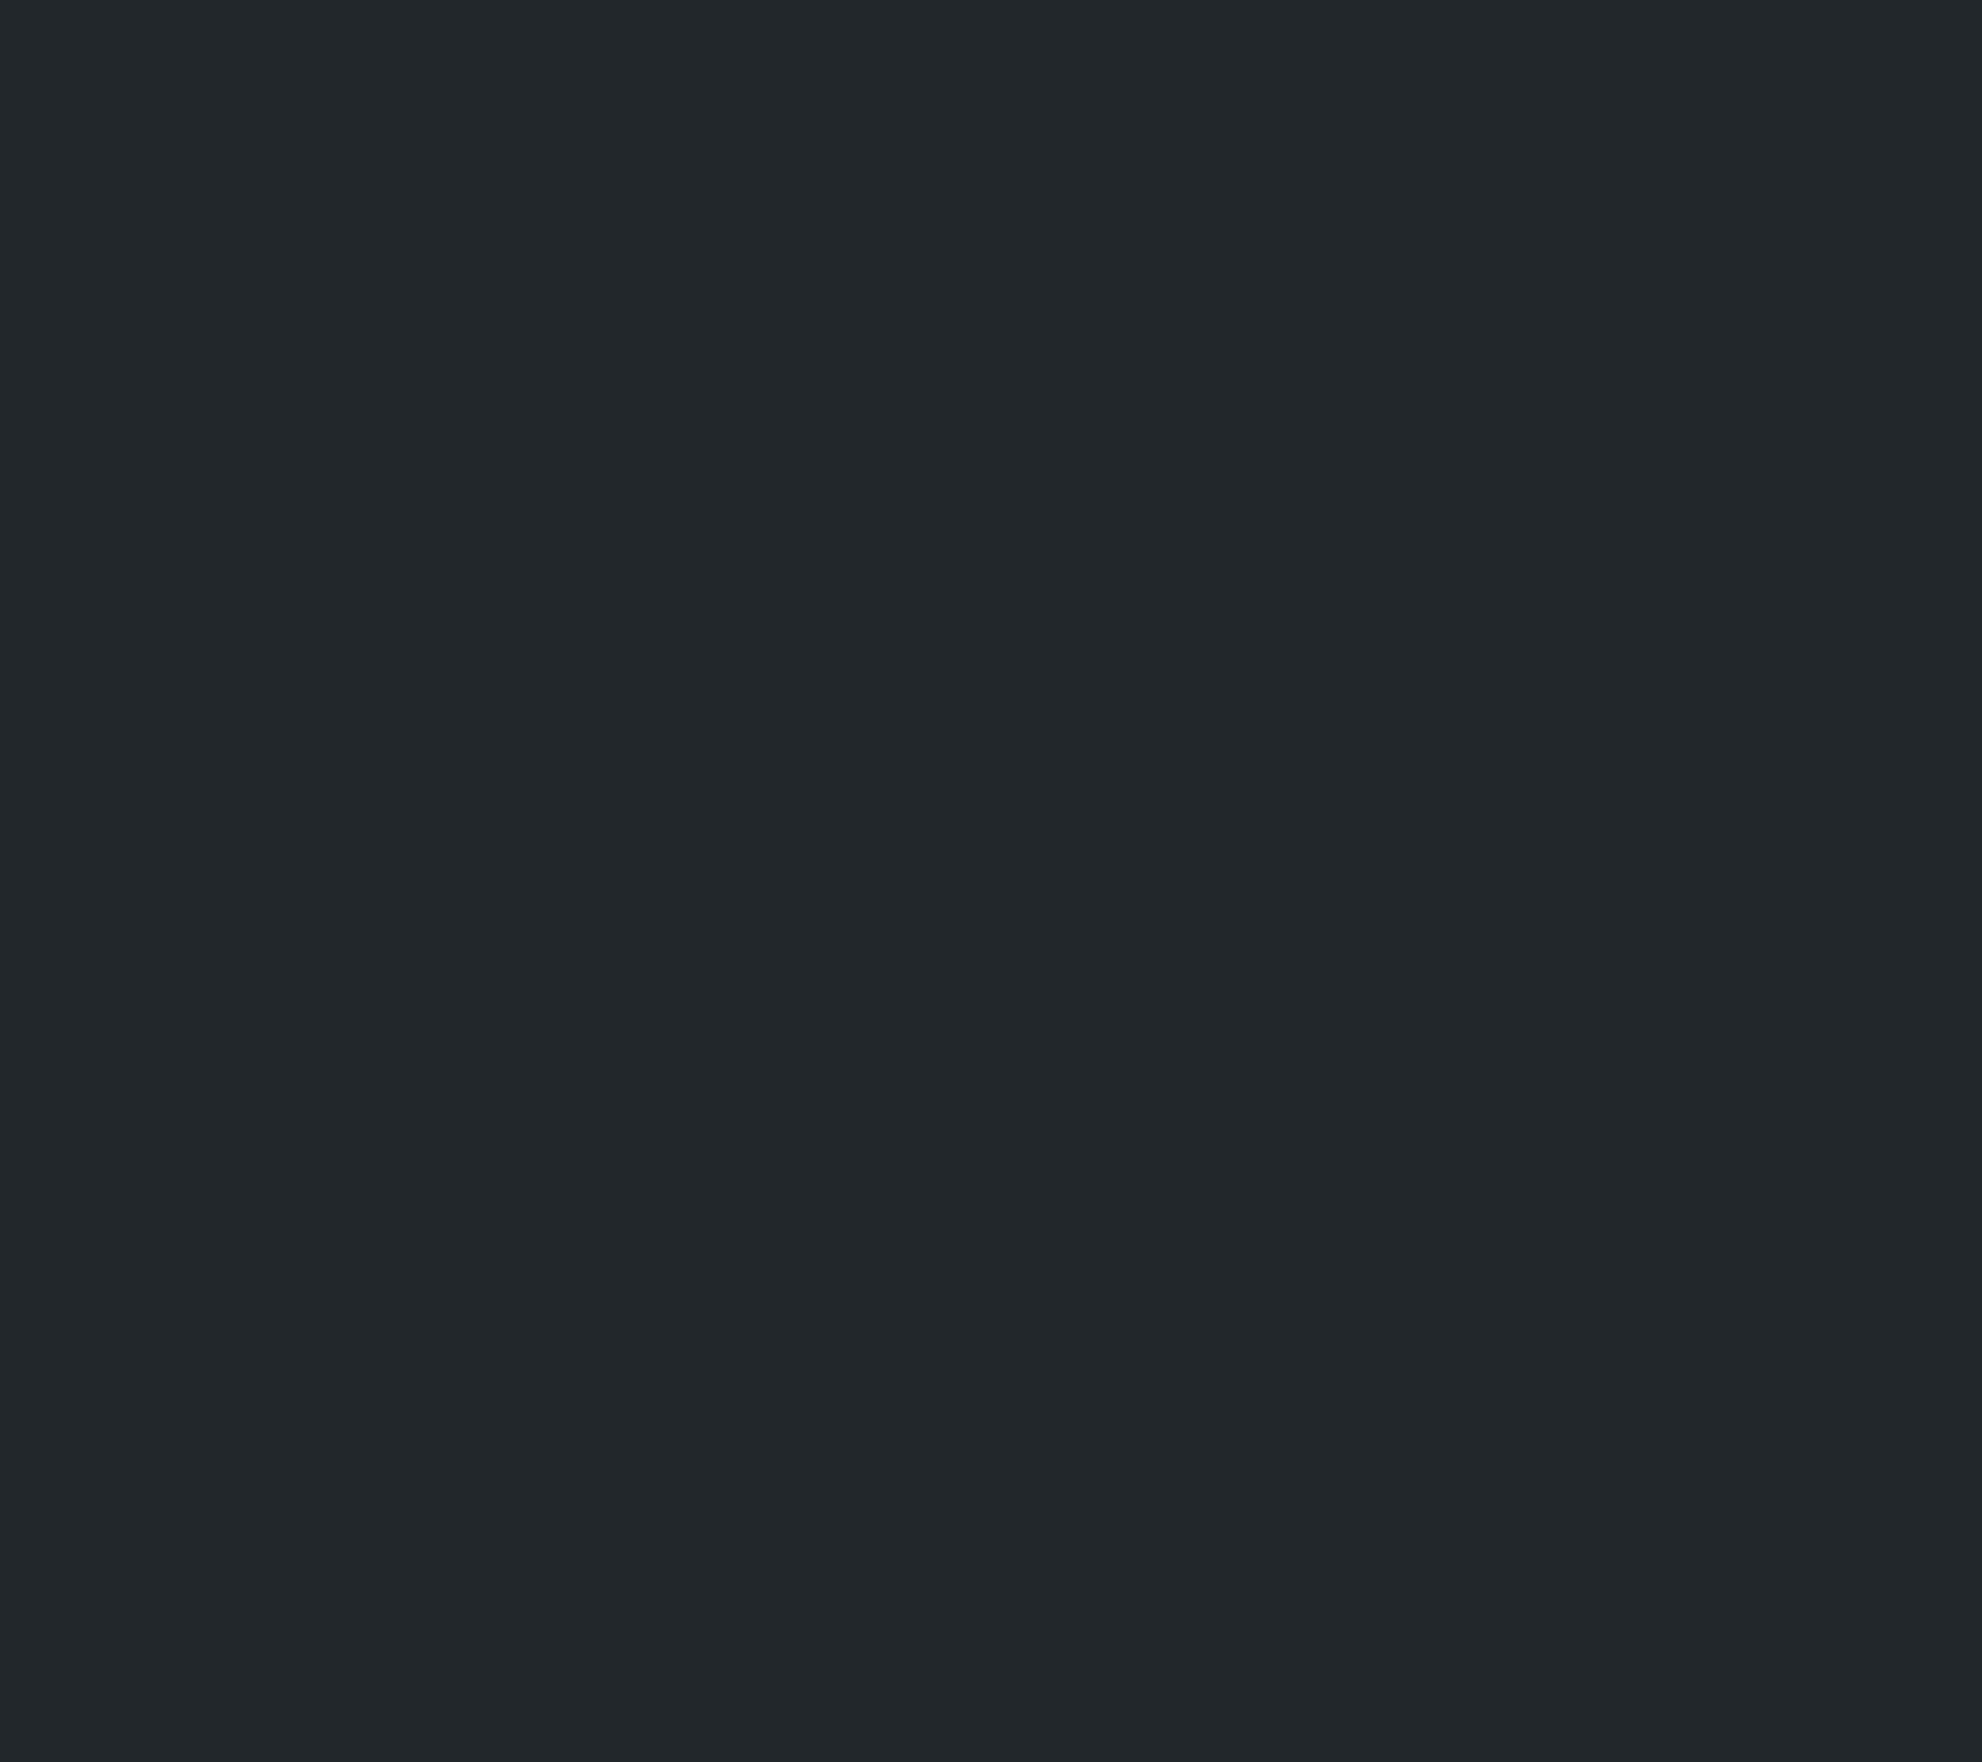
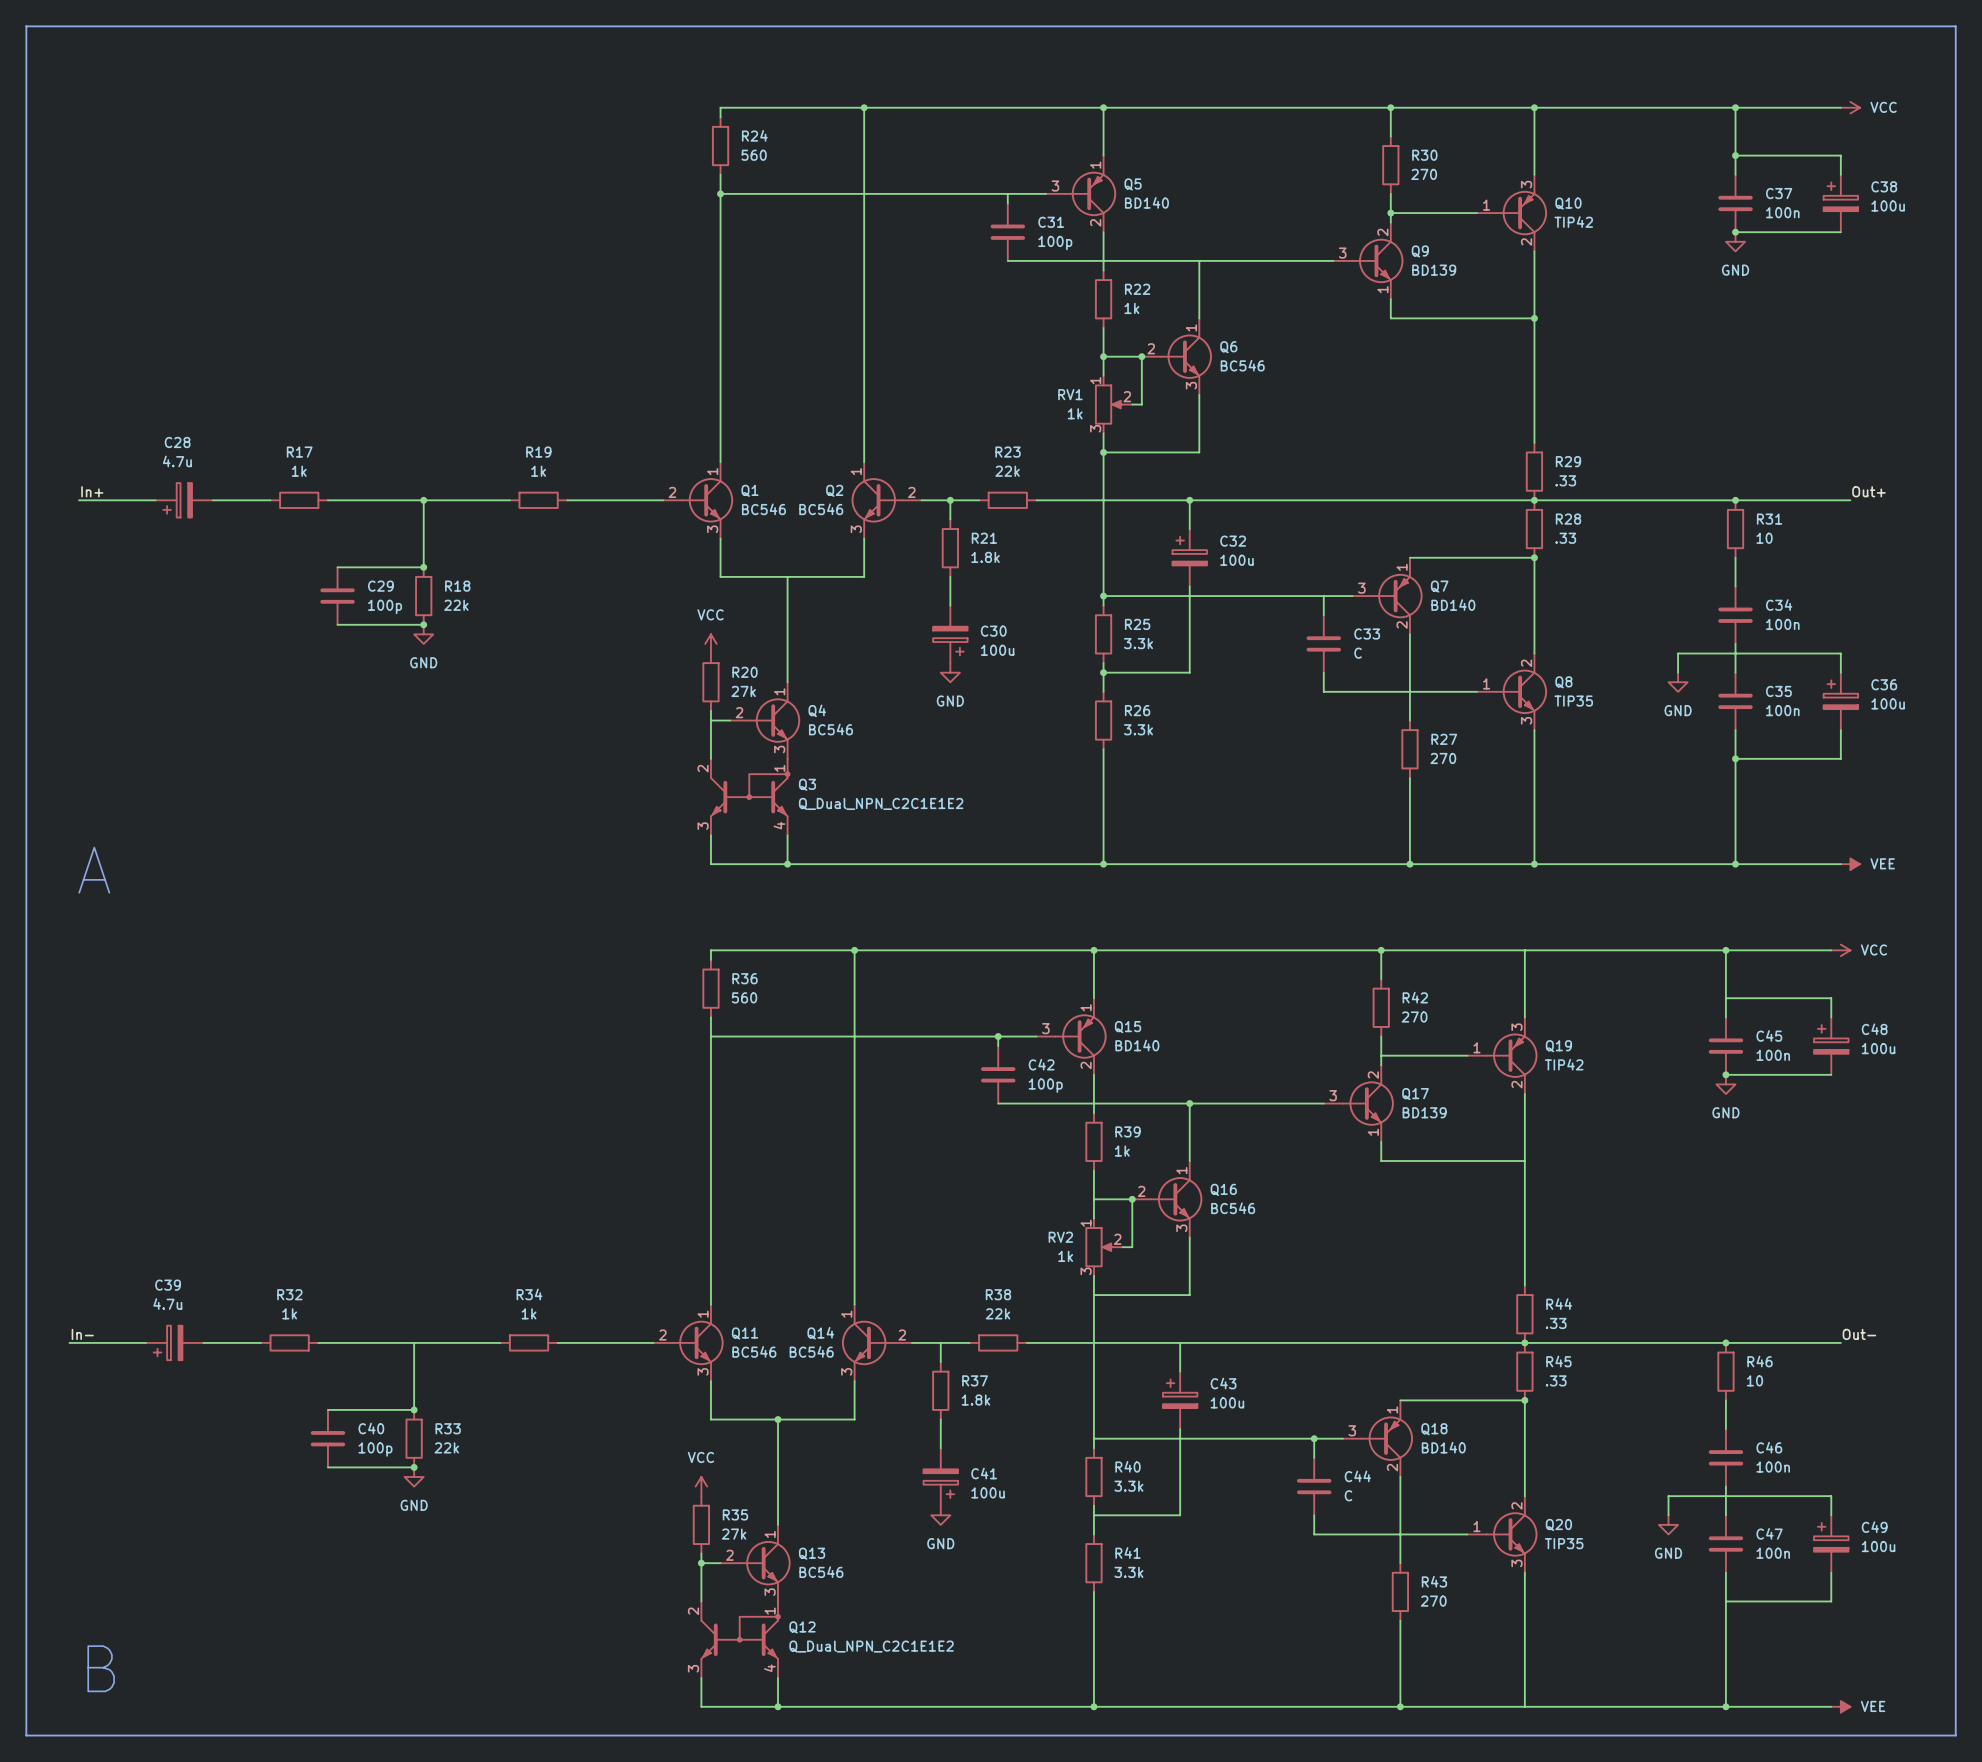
line: none -> (26, 26) (1955, 26) (1955, 1735) (26, 1735) (26, 26)
wire: none -> (864, 107) (864, 462)
junction: none -> (864, 107)
wire: none -> (1103, 107) (1103, 155)
junction: none -> (1103, 107)
wire: none -> (1390, 107) (1390, 136)
junction: none -> (1390, 107)
wire: none -> (1534, 107) (1534, 174)
junction: none -> (1534, 107)
wire: none -> (1735, 107) (1735, 174)
junction: none -> (1735, 107)
wire: none -> (1840, 107) (720, 107) (720, 117)
power symbol: none -> VCC (1850, 107)
R24: none -> 560 (720, 146)
wire: none -> (1735, 155) (1840, 155) (1840, 174)
junction: none -> (1735, 155)
R30: none -> 270 (1390, 165)
wire: none -> (720, 174) (720, 462)
wire: none -> (720, 193) (1046, 193)
junction: none -> (720, 193)
wire: none -> (1007, 193) (1007, 203)
Q5: none -> BD140 (1081, 193)
wire: none -> (1390, 193) (1390, 222)
C37: none -> 100n (1735, 203)
C38: none -> 100u (1840, 203)
wire: none -> (1390, 213) (1476, 213)
junction: none -> (1390, 213)
Q10: none -> TIP42 (1512, 213)
C31: none -> 100p (1007, 232)
wire: none -> (1103, 232) (1103, 270)
wire: none -> (1735, 232) (1840, 232)
junction: none -> (1735, 232)
power symbol: none -> GND (1735, 241)
wire: none -> (1534, 251) (1534, 442)
wire: none -> (1007, 260) (1333, 260)
wire: none -> (1199, 260) (1199, 318)
Q9: none -> BD139 (1368, 260)
R22: none -> 1k (1103, 299)
wire: none -> (1390, 299) (1390, 318) (1534, 318)
junction: none -> (1534, 318)
wire: none -> (1103, 327) (1103, 375)
wire: none -> (1103, 356) (1141, 356) (1141, 404) (1132, 404)
junction: none -> (1103, 356)
junction: none -> (1141, 356)
Q6: none -> BC546 (1176, 356)
wire: none -> (1199, 394) (1199, 452) (1103, 452)
RV1: none -> 1k (1113, 404)
wire: none -> (1103, 433) (1103, 605)
junction: none -> (1103, 452)
R29: none -> .33 (1534, 471)
label: none -> In+ (92, 491)
label: none -> Out+ (1868, 491)
wire: none -> (79, 500) (155, 500)
C28: none -> 4.7u (184, 500)
wire: none -> (213, 500) (270, 500)
R17: none -> 1k (299, 500)
wire: none -> (327, 500) (509, 500)
wire: none -> (423, 500) (423, 567) (337, 567)
junction: none -> (423, 500)
R19: none -> 1k (538, 500)
wire: none -> (567, 500) (663, 500)
Q1: none -> BC546 (698, 500)
Q2: none -> BC546 (886, 500)
wire: none -> (921, 500) (979, 500)
wire: none -> (950, 500) (950, 519)
junction: none -> (950, 500)
R23: none -> 22k (1007, 500)
wire: none -> (1036, 500) (1850, 500)
wire: none -> (1189, 500) (1189, 529)
junction: none -> (1189, 500)
junction: none -> (1534, 500)
junction: none -> (1735, 500)
R28: none -> .33 (1534, 529)
R31: none -> 10 (1735, 529)
wire: none -> (720, 538) (720, 576) (864, 576) (864, 538)
R21: none -> 1.8k (950, 548)
C32: none -> 100u (1189, 557)
wire: none -> (1409, 557) (1534, 557) (1534, 653)
junction: none -> (1534, 557)
wire: none -> (1735, 557) (1735, 586)
junction: none -> (423, 567)
wire: none -> (787, 576) (787, 682)
wire: none -> (950, 576) (950, 605)
wire: none -> (1189, 586) (1189, 672) (1103, 672)
C29: none -> 100p (337, 596)
R18: none -> 22k (423, 596)
wire: none -> (1103, 596) (1352, 596)
junction: none -> (1103, 596)
wire: none -> (1323, 596) (1323, 615)
Q7: none -> BD140 (1387, 596)
C34: none -> 100n (1735, 615)
wire: none -> (337, 624) (423, 624)
junction: none -> (423, 624)
power symbol: none -> GND (423, 634)
C30: none -> 100u (950, 634)
R25: none -> 3.3k (1103, 634)
wire: none -> (1409, 634) (1409, 720)
power symbol: none -> VCC (710, 643)
C33: none -> C (1323, 643)
wire: none -> (1735, 643) (1735, 672)
wire: none -> (1103, 663) (1103, 691)
power symbol: none -> GND (950, 672)
junction: none -> (1103, 672)
wire: none -> (1323, 672) (1323, 691) (1476, 691)
wire: none -> (1678, 672) (1678, 653) (1840, 653) (1840, 672)
R20: none -> 27k (710, 682)
power symbol: none -> GND (1678, 682)
Q8: none -> TIP35 (1512, 691)
C35: none -> 100n (1735, 701)
C36: none -> 100u (1840, 701)
wire: none -> (710, 710) (710, 758)
wire: none -> (710, 720) (730, 720)
Q4: none -> BC546 (765, 720)
R26: none -> 3.3k (1103, 720)
wire: none -> (1534, 730) (1534, 864)
wire: none -> (1735, 730) (1735, 864)
wire: none -> (1840, 730) (1840, 758) (1735, 758)
wire: none -> (1103, 749) (1103, 864)
R27: none -> 270 (1409, 749)
junction: none -> (1735, 758)
wire: none -> (1409, 778) (1409, 864)
Q3: none -> Q_Dual_NPN_C2C1E1E2 (750, 797)
wire: none -> (710, 835) (710, 864) (1840, 864)
wire: none -> (787, 835) (787, 864)
junction: none -> (787, 864)
junction: none -> (1103, 864)
junction: none -> (1409, 864)
junction: none -> (1534, 864)
junction: none -> (1735, 864)
power symbol: none -> VEE (1850, 864)
text: none -> A (94, 870)
wire: none -> (854, 950) (854, 1304)
junction: none -> (854, 950)
wire: none -> (1093, 950) (1093, 998)
junction: none -> (1093, 950)
wire: none -> (1381, 950) (1381, 979)
junction: none -> (1381, 950)
wire: none -> (1524, 950) (1524, 1017)
wire: none -> (1725, 950) (1725, 1017)
junction: none -> (1725, 950)
wire: none -> (1831, 950) (710, 950) (710, 959)
power symbol: none -> VCC (1840, 950)
R36: none -> 560 (710, 988)
wire: none -> (1725, 998) (1831, 998) (1831, 1017)
R42: none -> 270 (1381, 1007)
wire: none -> (710, 1017) (710, 1304)
wire: none -> (710, 1036) (1036, 1036)
wire: none -> (998, 1036) (998, 1046)
junction: none -> (998, 1036)
Q15: none -> BD140 (1071, 1036)
wire: none -> (1381, 1036) (1381, 1065)
C45: none -> 100n (1725, 1046)
C48: none -> 100u (1831, 1046)
wire: none -> (1381, 1055) (1467, 1055)
Q19: none -> TIP42 (1502, 1055)
C42: none -> 100p (998, 1074)
wire: none -> (1093, 1074) (1093, 1113)
wire: none -> (1725, 1074) (1831, 1074)
junction: none -> (1725, 1074)
power symbol: none -> GND (1725, 1084)
wire: none -> (1524, 1093) (1524, 1285)
wire: none -> (998, 1103) (1323, 1103)
wire: none -> (1189, 1103) (1189, 1161)
junction: none -> (1189, 1103)
Q17: none -> BD139 (1358, 1103)
R39: none -> 1k (1093, 1141)
wire: none -> (1381, 1141) (1381, 1161) (1524, 1161)
wire: none -> (1093, 1170) (1093, 1218)
wire: none -> (1093, 1199) (1132, 1199) (1132, 1247) (1122, 1247)
junction: none -> (1132, 1199)
Q16: none -> BC546 (1167, 1199)
wire: none -> (1189, 1237) (1189, 1295) (1093, 1295)
RV2: none -> 1k (1104, 1247)
wire: none -> (1093, 1275) (1093, 1448)
R44: none -> .33 (1524, 1314)
label: none -> In- (82, 1334)
label: none -> Out- (1859, 1334)
wire: none -> (69, 1342) (146, 1342)
C39: none -> 4.7u (174, 1342)
wire: none -> (203, 1342) (260, 1342)
R32: none -> 1k (289, 1342)
wire: none -> (318, 1342) (500, 1342)
wire: none -> (414, 1342) (414, 1409) (327, 1409)
R34: none -> 1k (529, 1342)
wire: none -> (557, 1342) (653, 1342)
Q11: none -> BC546 (688, 1342)
Q14: none -> BC546 (877, 1342)
wire: none -> (912, 1342) (969, 1342)
wire: none -> (940, 1342) (940, 1362)
R38: none -> 22k (998, 1342)
wire: none -> (1026, 1342) (1840, 1342)
wire: none -> (1180, 1342) (1180, 1371)
junction: none -> (1524, 1342)
junction: none -> (1725, 1342)
R45: none -> .33 (1524, 1371)
R46: none -> 10 (1725, 1371)
wire: none -> (710, 1381) (710, 1419) (854, 1419) (854, 1381)
R37: none -> 1.8k (940, 1390)
C43: none -> 100u (1180, 1400)
wire: none -> (1400, 1400) (1524, 1400) (1524, 1496)
junction: none -> (1524, 1400)
wire: none -> (1725, 1400) (1725, 1429)
junction: none -> (414, 1409)
wire: none -> (778, 1419) (778, 1524)
junction: none -> (778, 1419)
wire: none -> (940, 1419) (940, 1448)
wire: none -> (1180, 1429) (1180, 1515) (1093, 1515)
C40: none -> 100p (327, 1438)
R33: none -> 22k (414, 1438)
wire: none -> (1093, 1438) (1342, 1438)
wire: none -> (1314, 1438) (1314, 1457)
junction: none -> (1314, 1438)
Q18: none -> BD140 (1377, 1438)
C46: none -> 100n (1725, 1457)
wire: none -> (327, 1467) (414, 1467)
junction: none -> (414, 1467)
power symbol: none -> GND (414, 1476)
C41: none -> 100u (940, 1476)
R40: none -> 3.3k (1093, 1476)
wire: none -> (1400, 1476) (1400, 1563)
power symbol: none -> VCC (701, 1486)
C44: none -> C (1314, 1486)
wire: none -> (1725, 1486) (1725, 1515)
wire: none -> (1093, 1505) (1093, 1534)
power symbol: none -> GND (940, 1515)
wire: none -> (1314, 1515) (1314, 1534) (1467, 1534)
wire: none -> (1668, 1515) (1668, 1496) (1831, 1496) (1831, 1515)
R35: none -> 27k (701, 1524)
power symbol: none -> GND (1668, 1524)
Q20: none -> TIP35 (1502, 1534)
C47: none -> 100n (1725, 1544)
C49: none -> 100u (1831, 1544)
wire: none -> (701, 1553) (701, 1601)
wire: none -> (701, 1563) (720, 1563)
junction: none -> (701, 1563)
Q13: none -> BC546 (755, 1563)
R41: none -> 3.3k (1093, 1563)
wire: none -> (1524, 1572) (1524, 1706)
wire: none -> (1725, 1572) (1725, 1706)
wire: none -> (1831, 1572) (1831, 1601) (1725, 1601)
wire: none -> (1093, 1591) (1093, 1706)
R43: none -> 270 (1400, 1591)
wire: none -> (1400, 1620) (1400, 1706)
Q12: none -> Q_Dual_NPN_C2C1E1E2 (740, 1639)
text: none -> B (101, 1668)
wire: none -> (701, 1678) (701, 1706) (1831, 1706)
wire: none -> (778, 1678) (778, 1706)
junction: none -> (778, 1706)
junction: none -> (1093, 1706)
junction: none -> (1400, 1706)
junction: none -> (1725, 1706)
power symbol: none -> VEE (1840, 1706)

